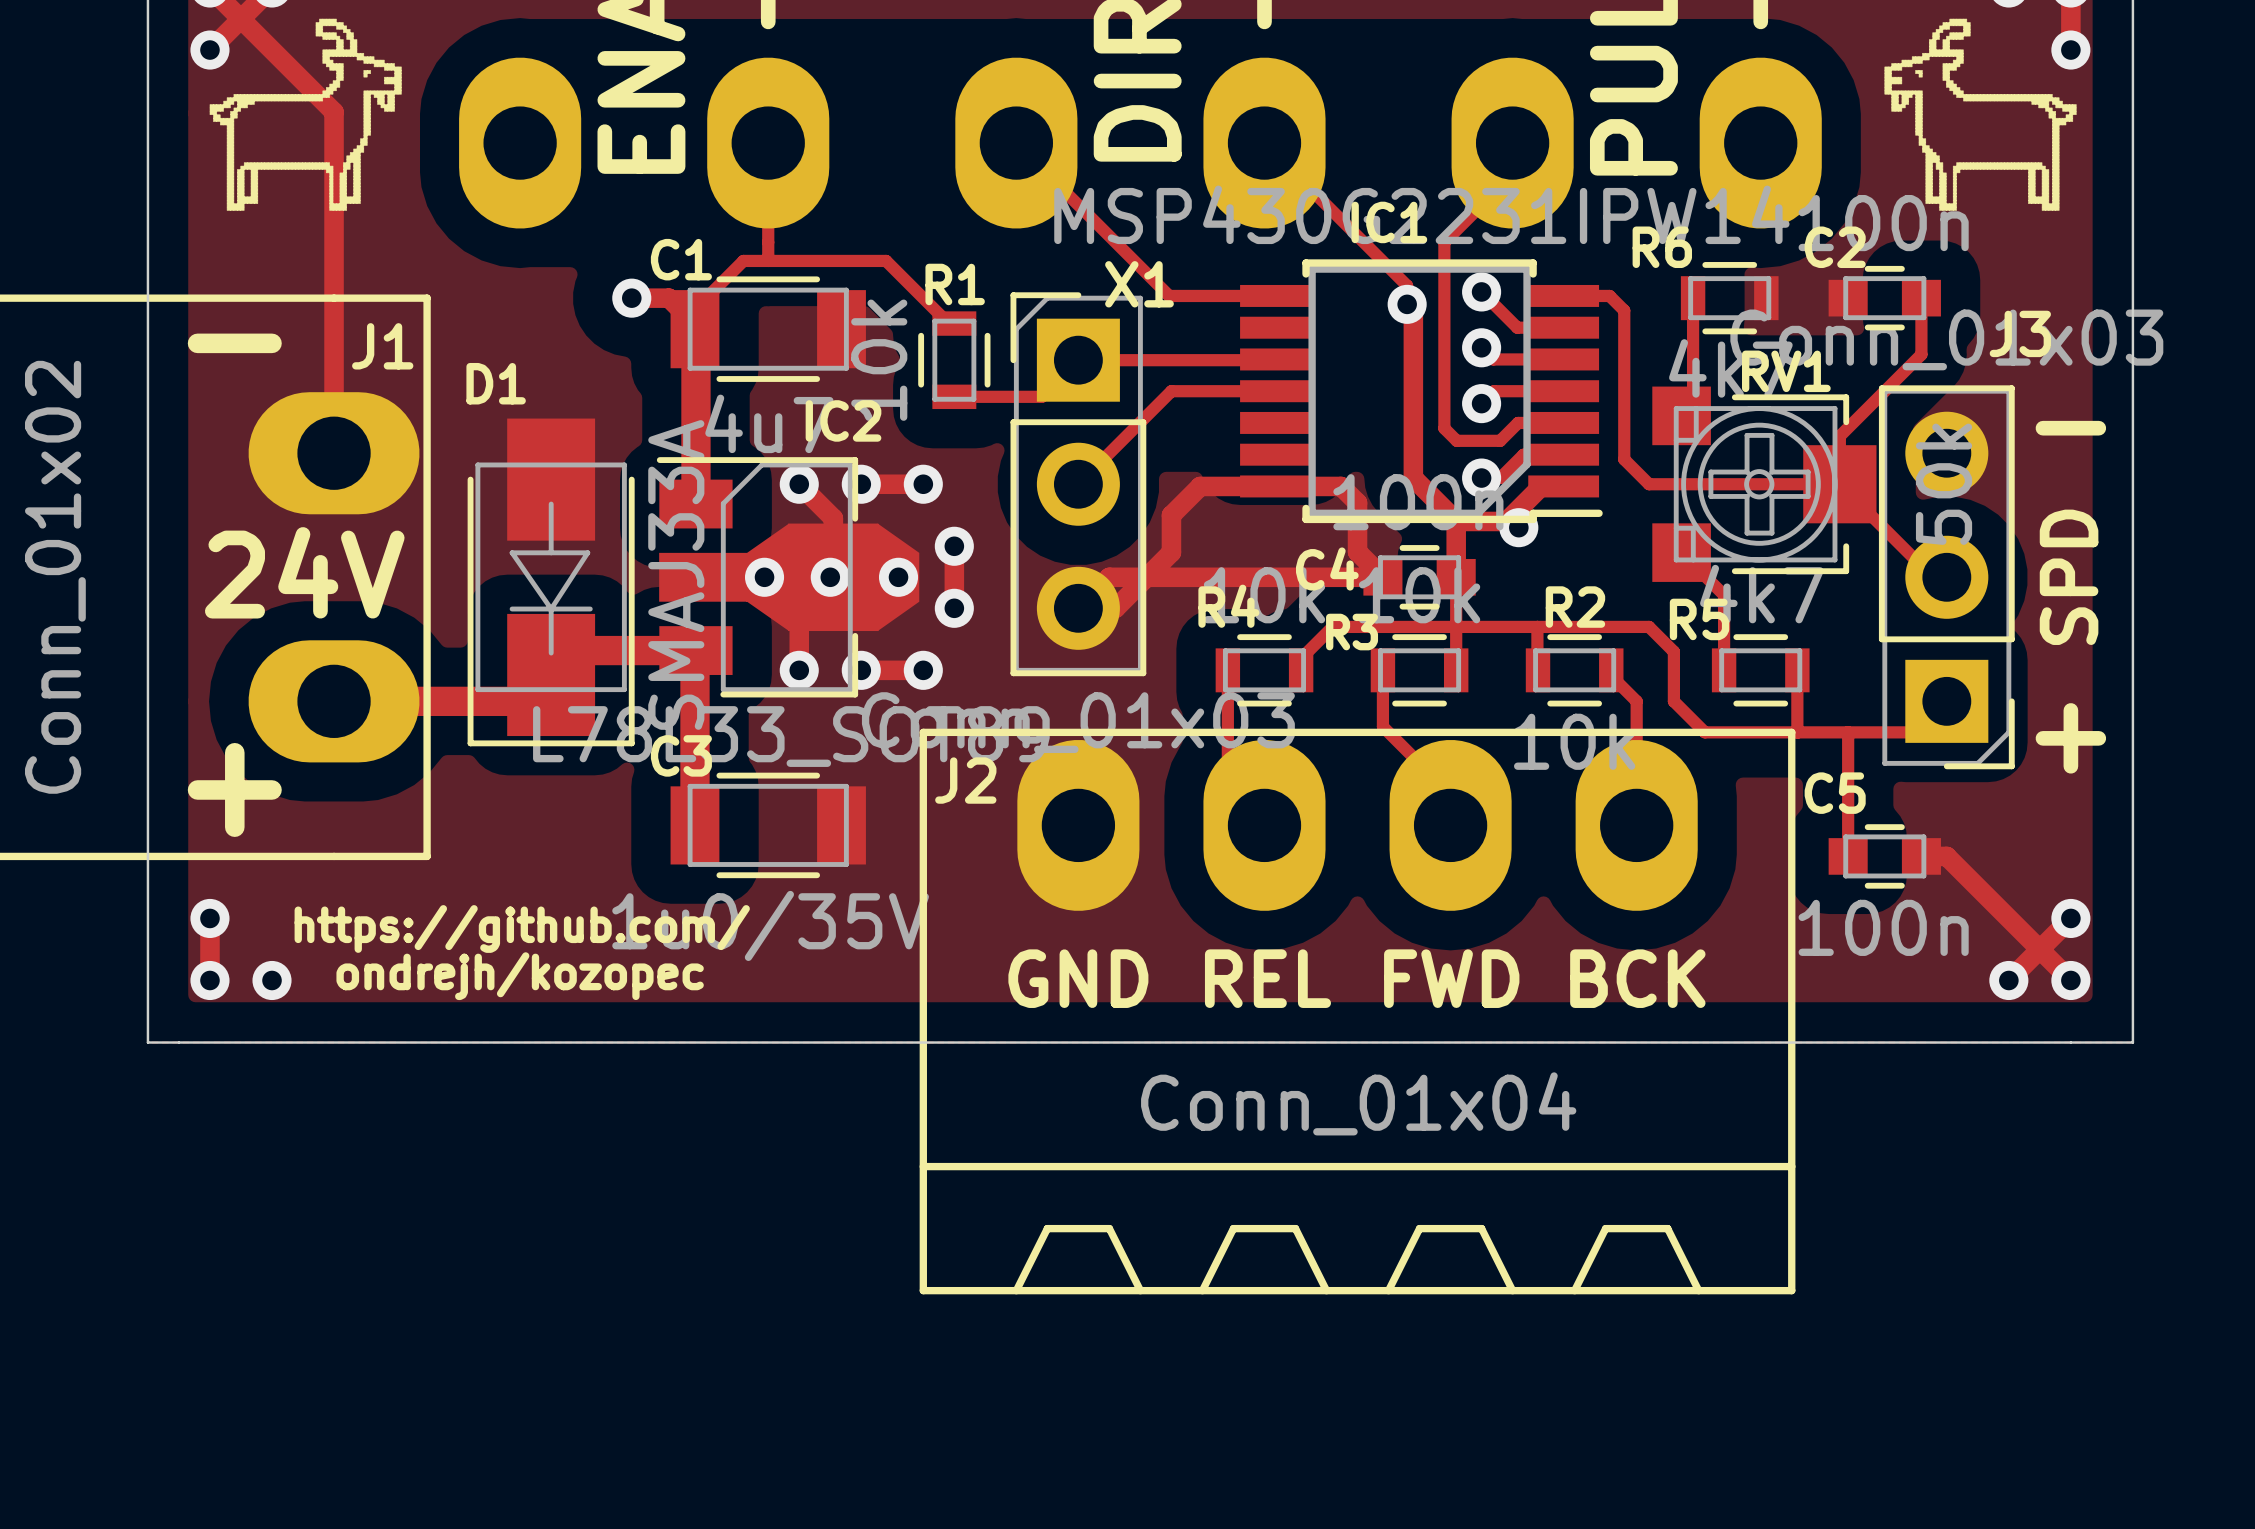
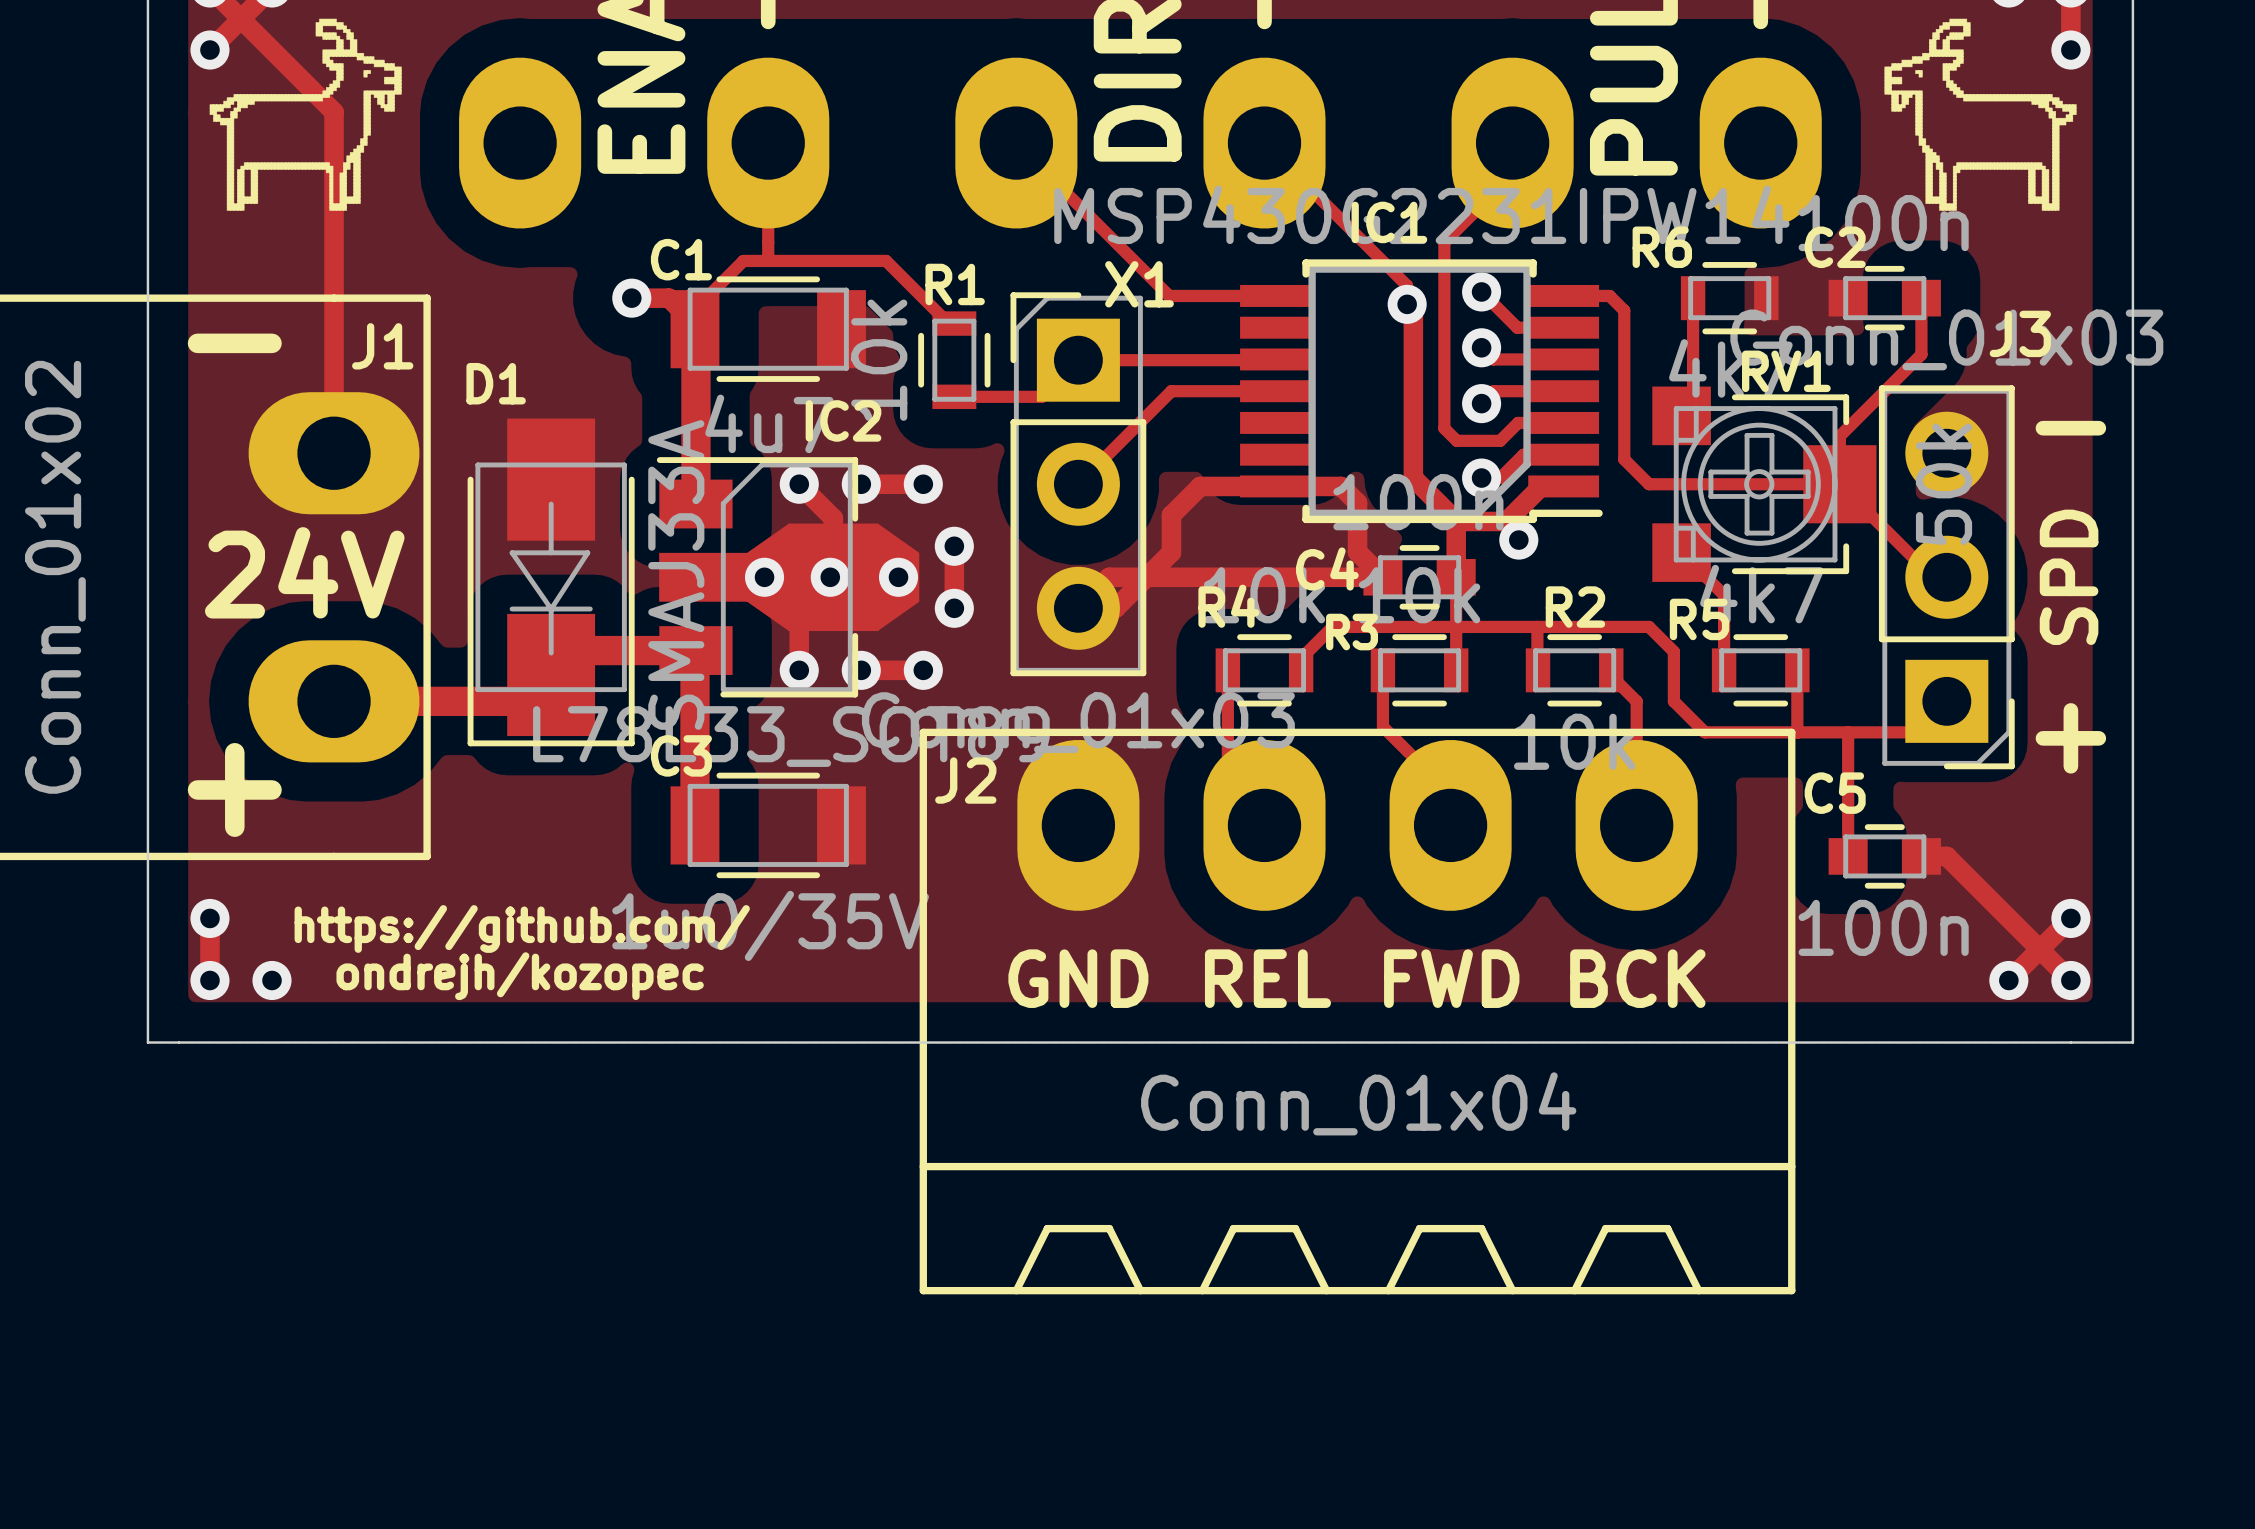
via position: (1518, 527) -> (1518, 540)

